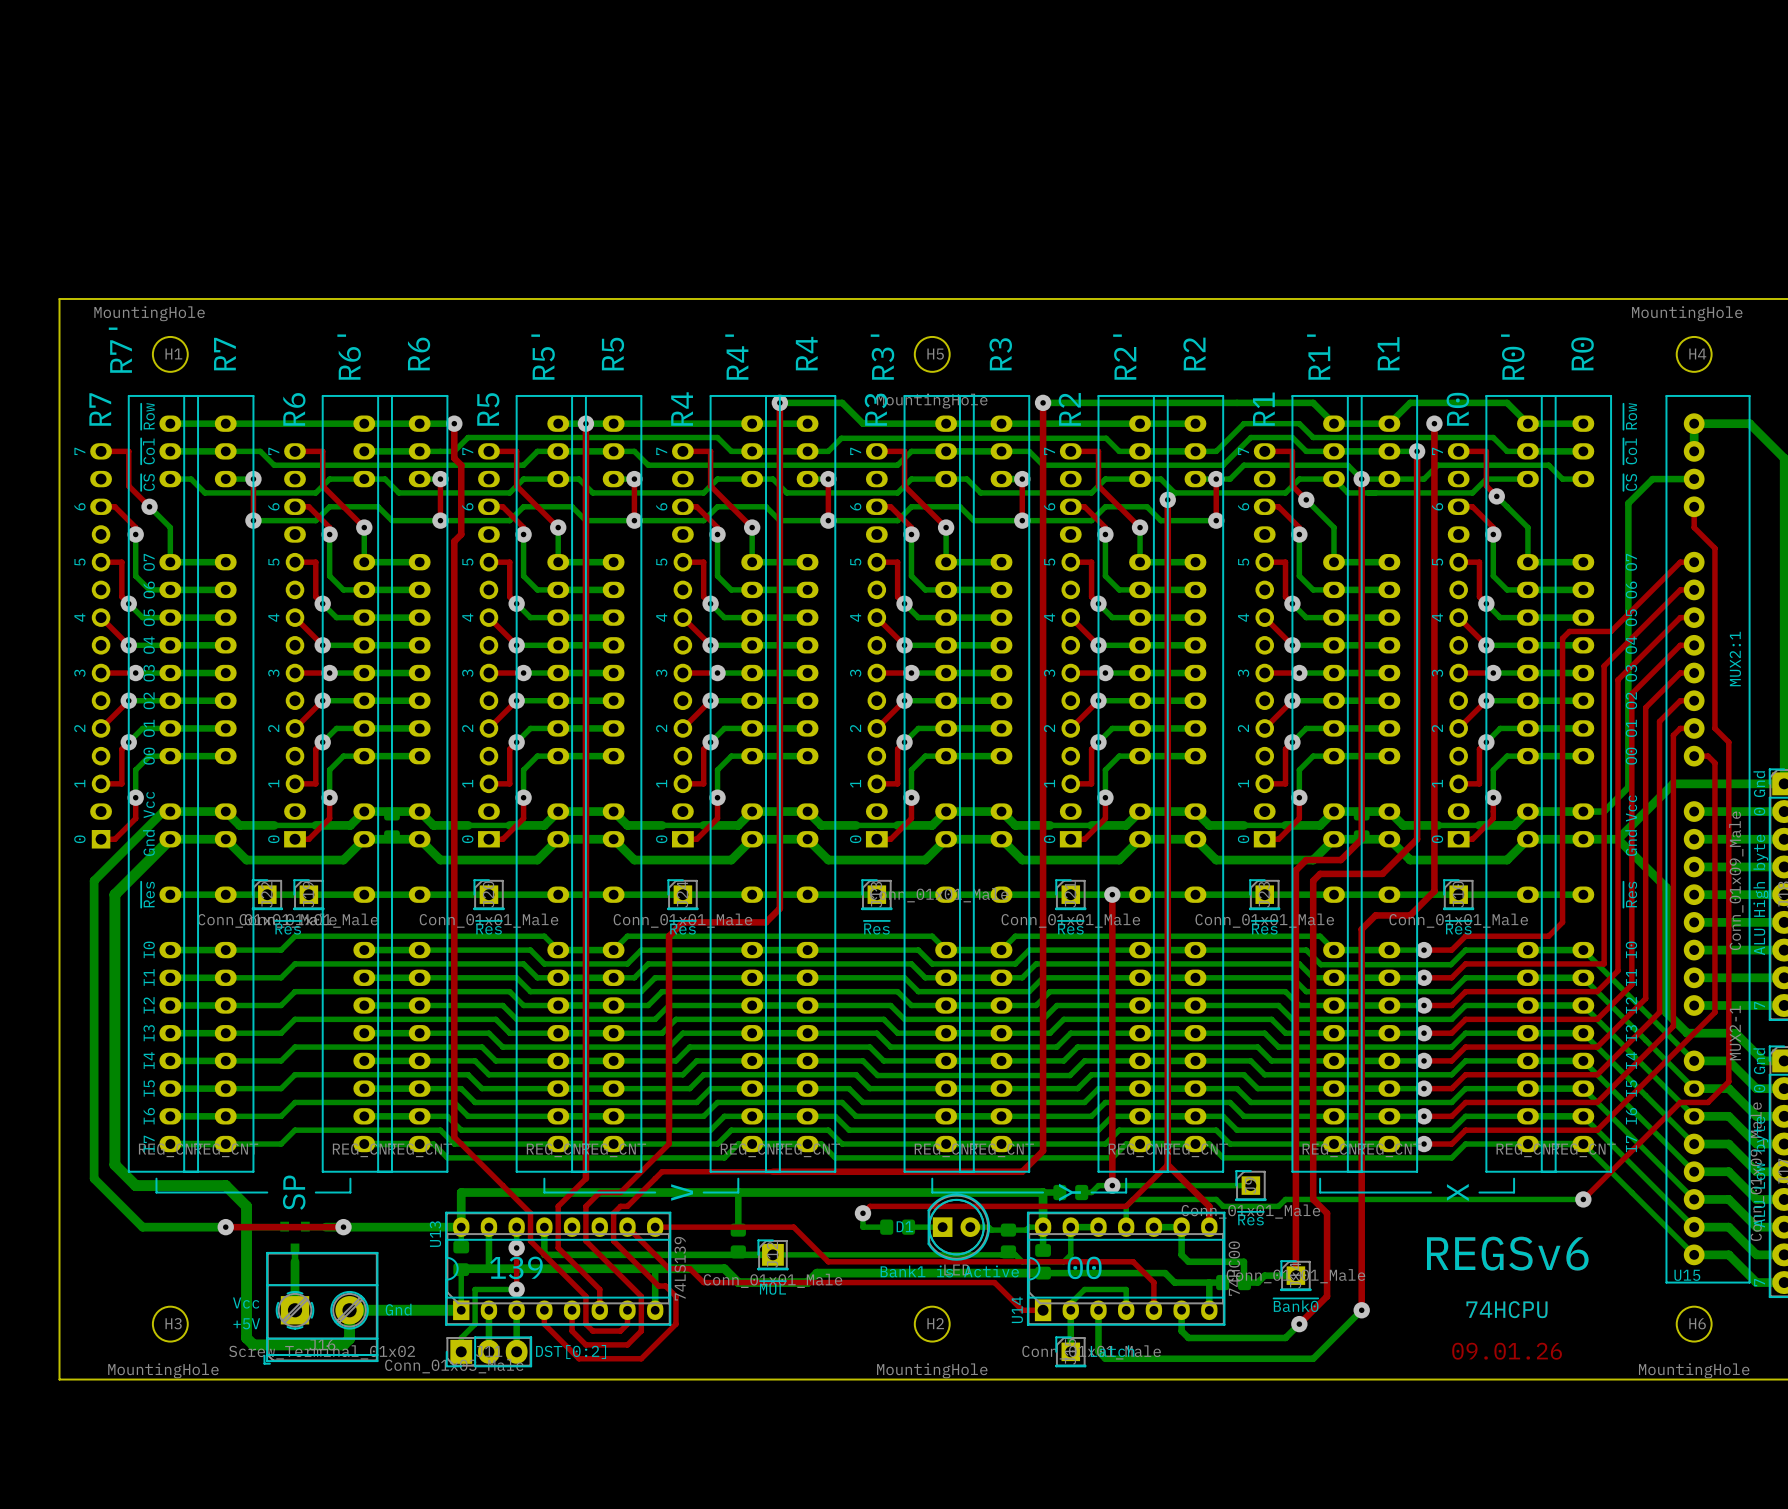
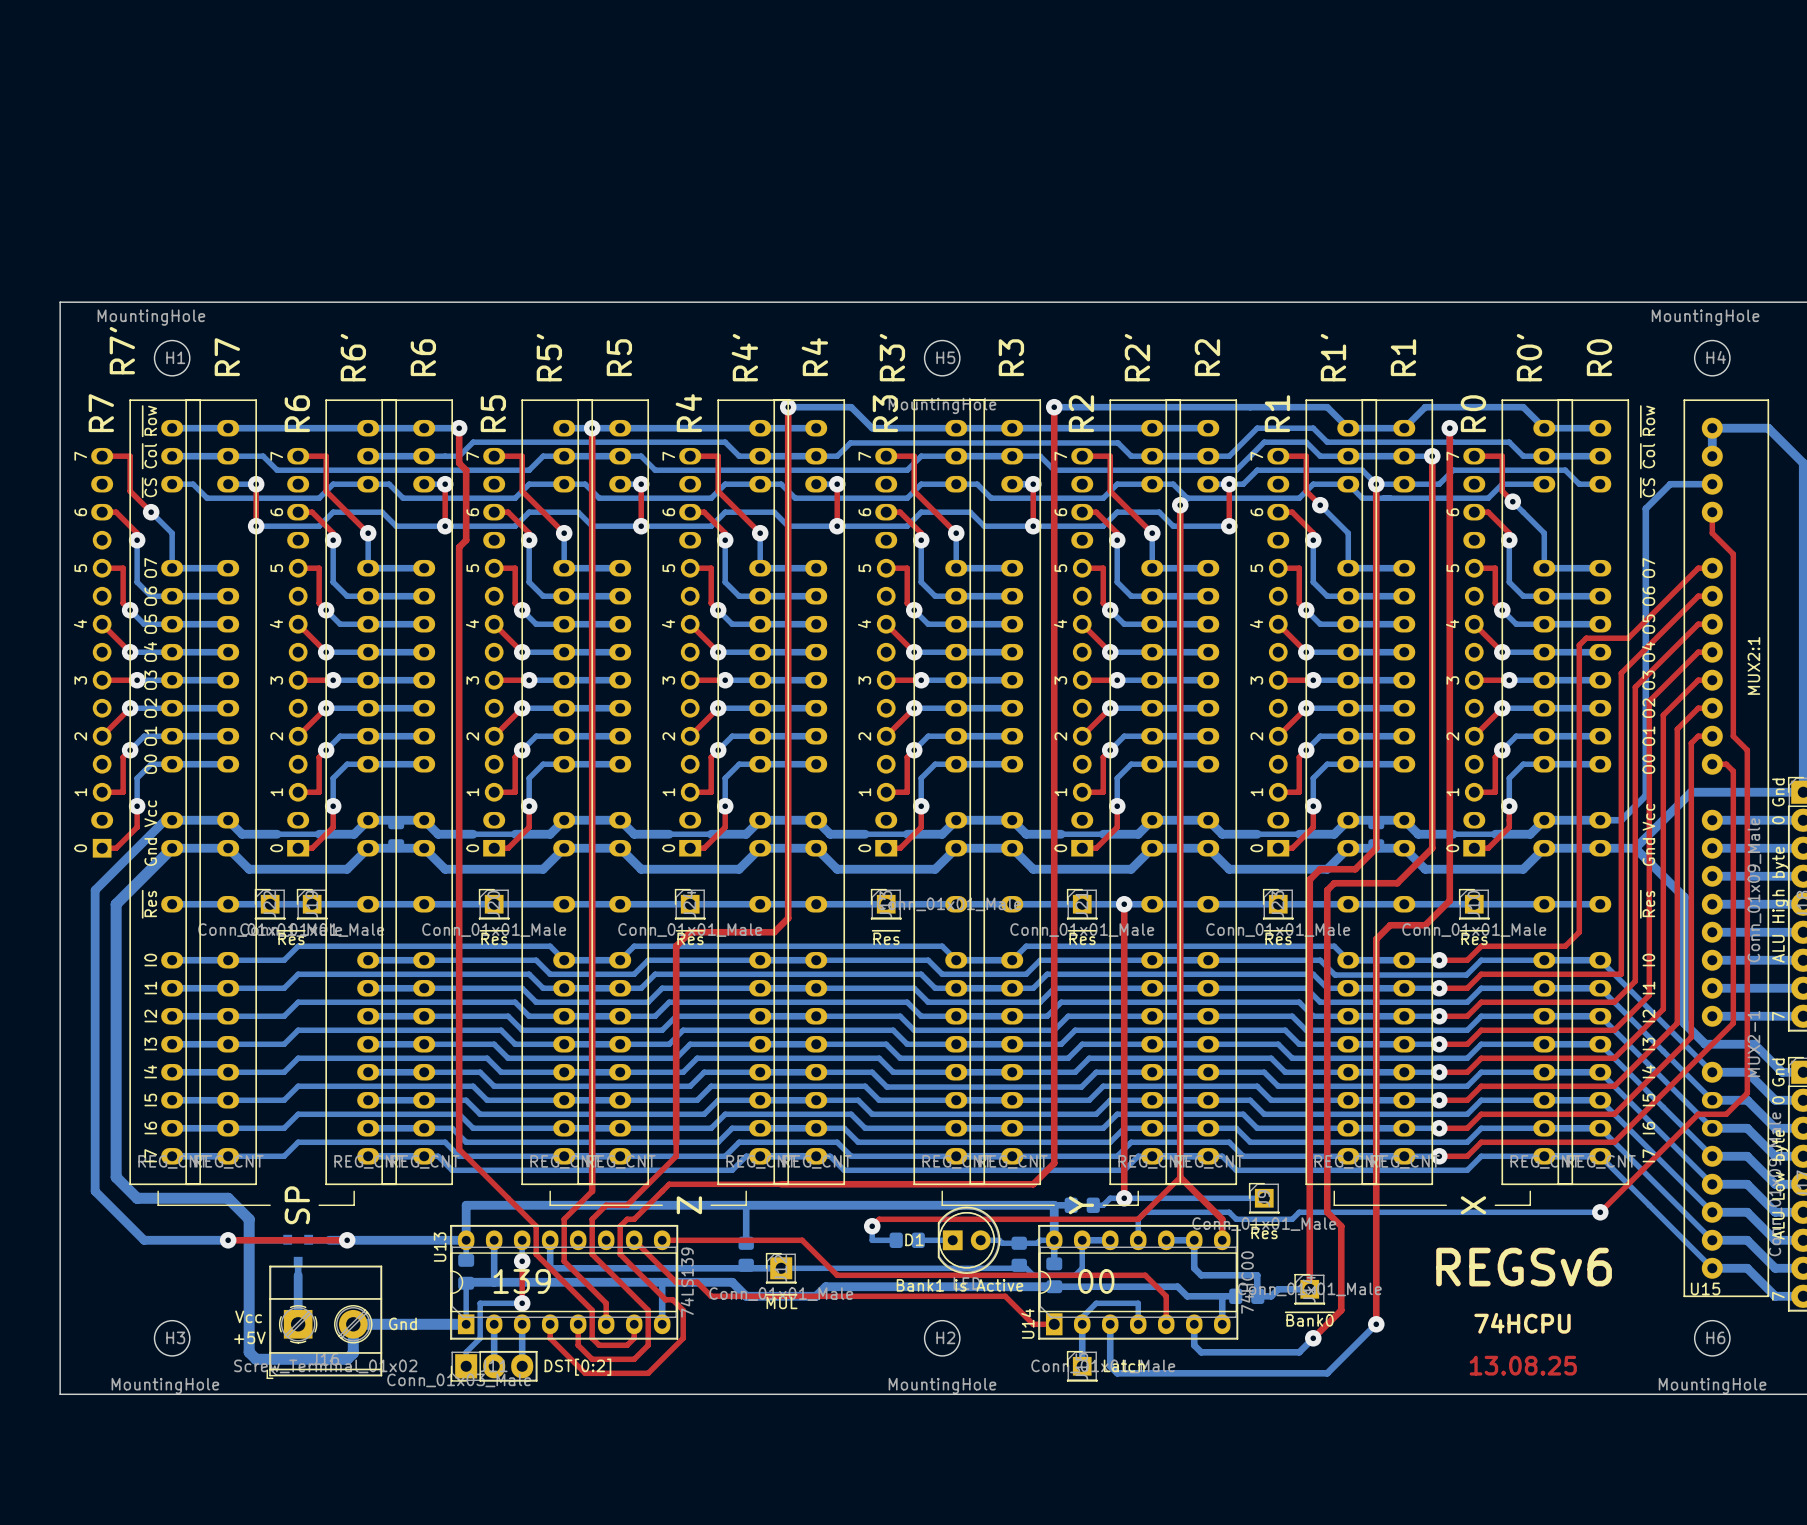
text: V (682, 1192) -> Z (689, 1205)
text: 09.01.26 (1507, 1351) -> 13.08.25 (1523, 1365)

